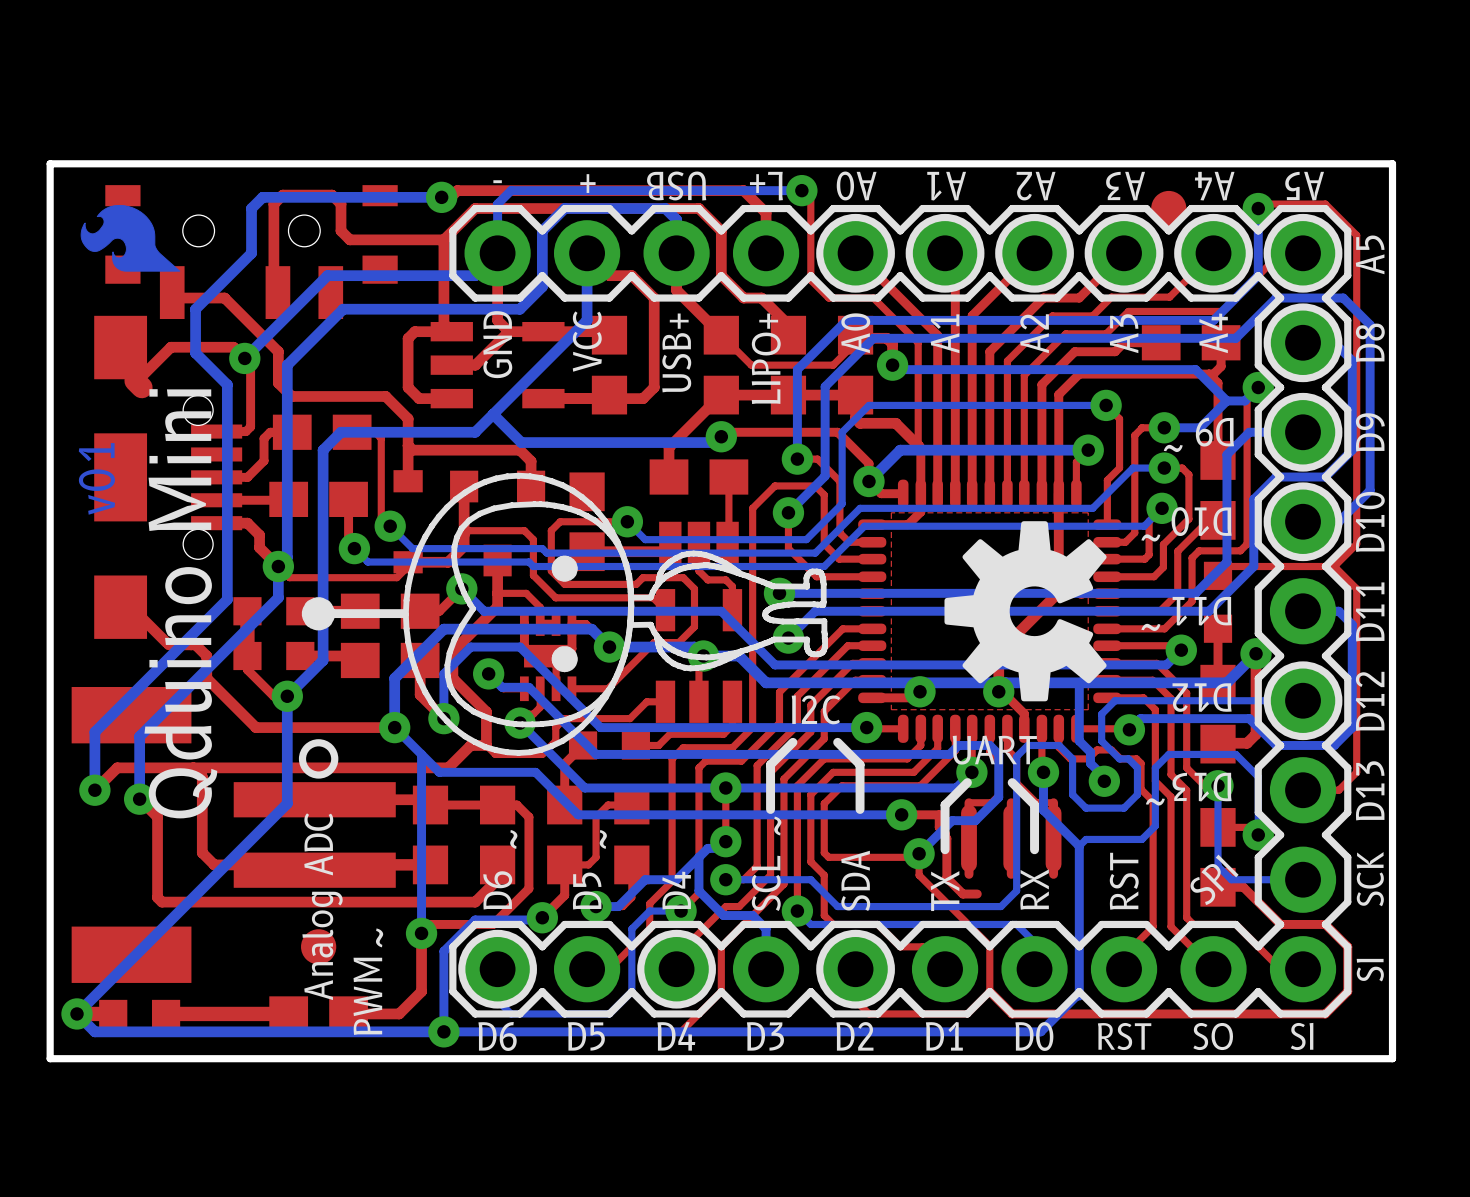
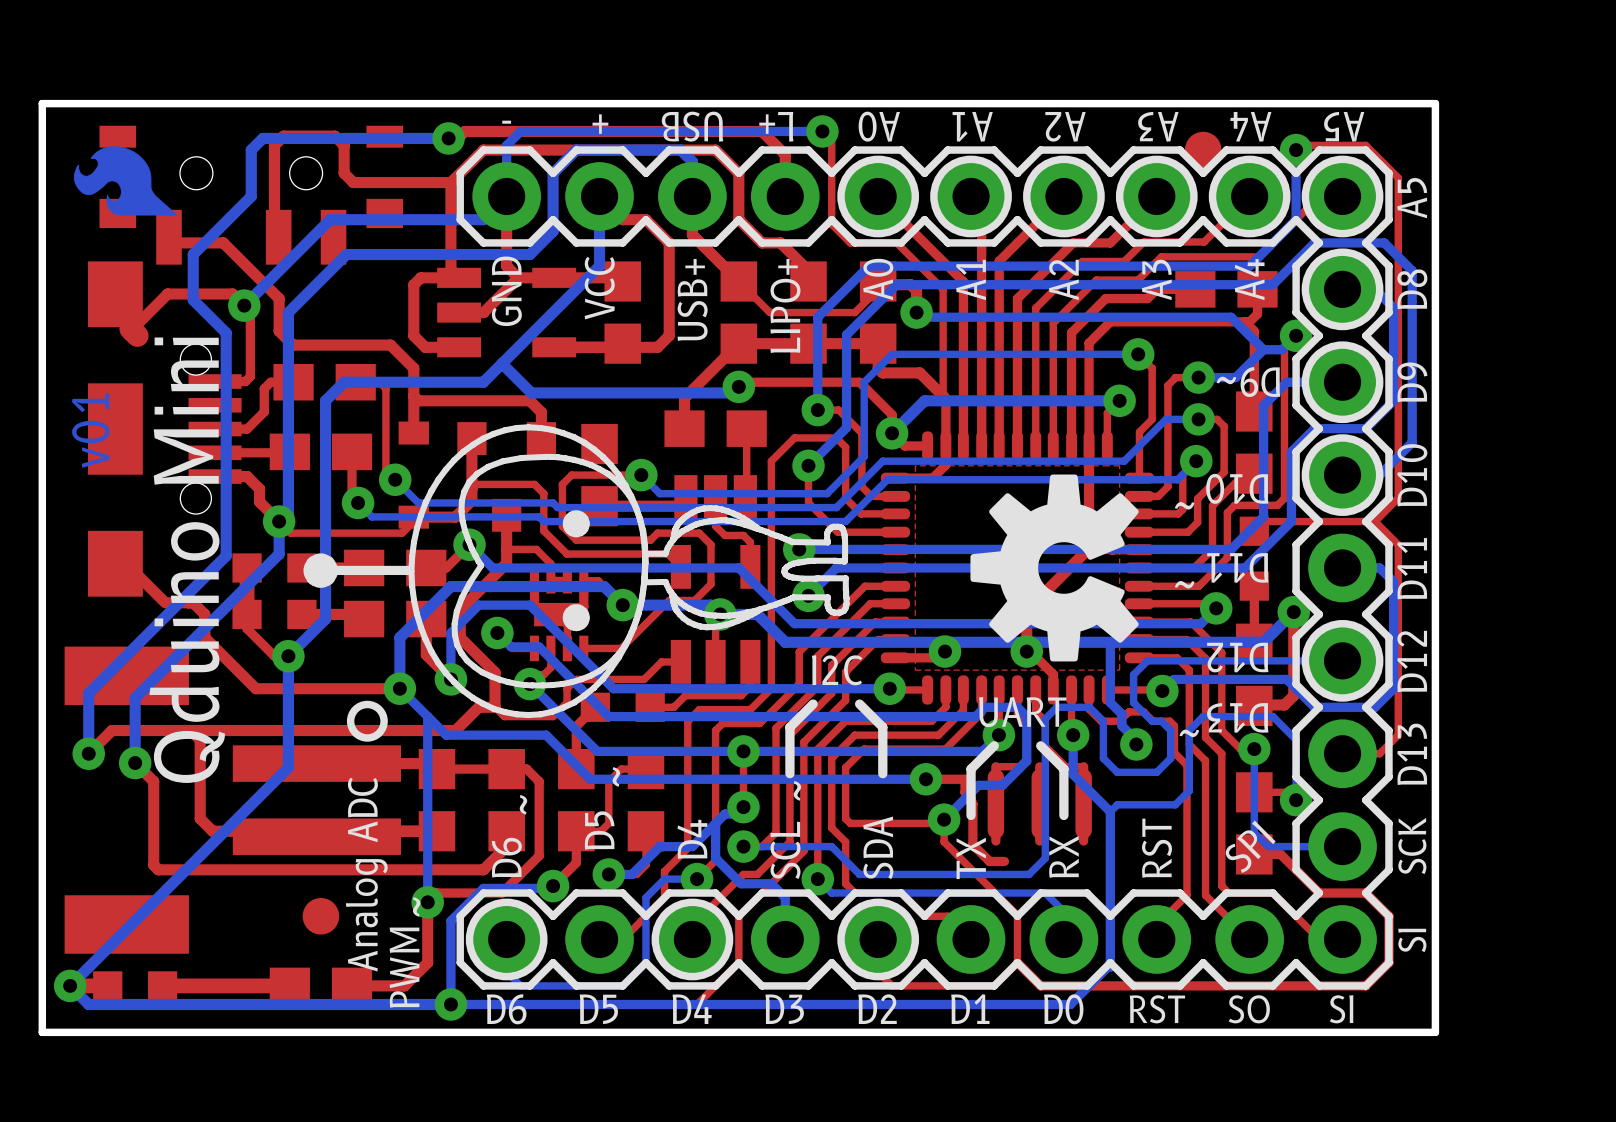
part footprint: [298, 204, 1352, 1018] -> [346, 146, 1393, 990]

